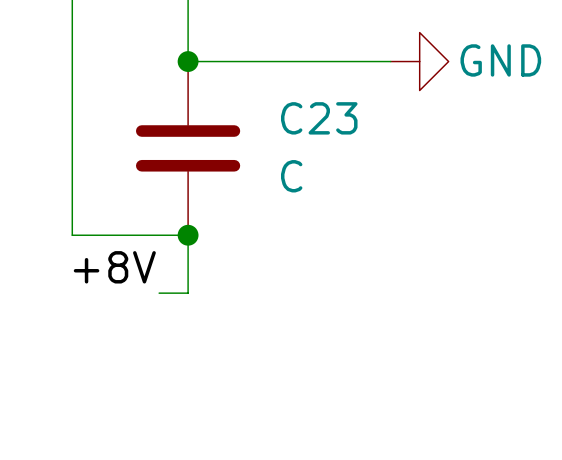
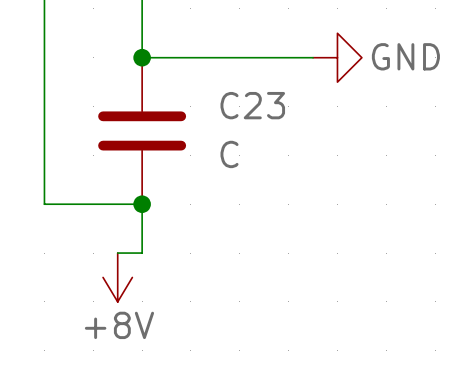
label: +8V (114, 267) -> none
power symbol: none -> +8V (117, 277)

